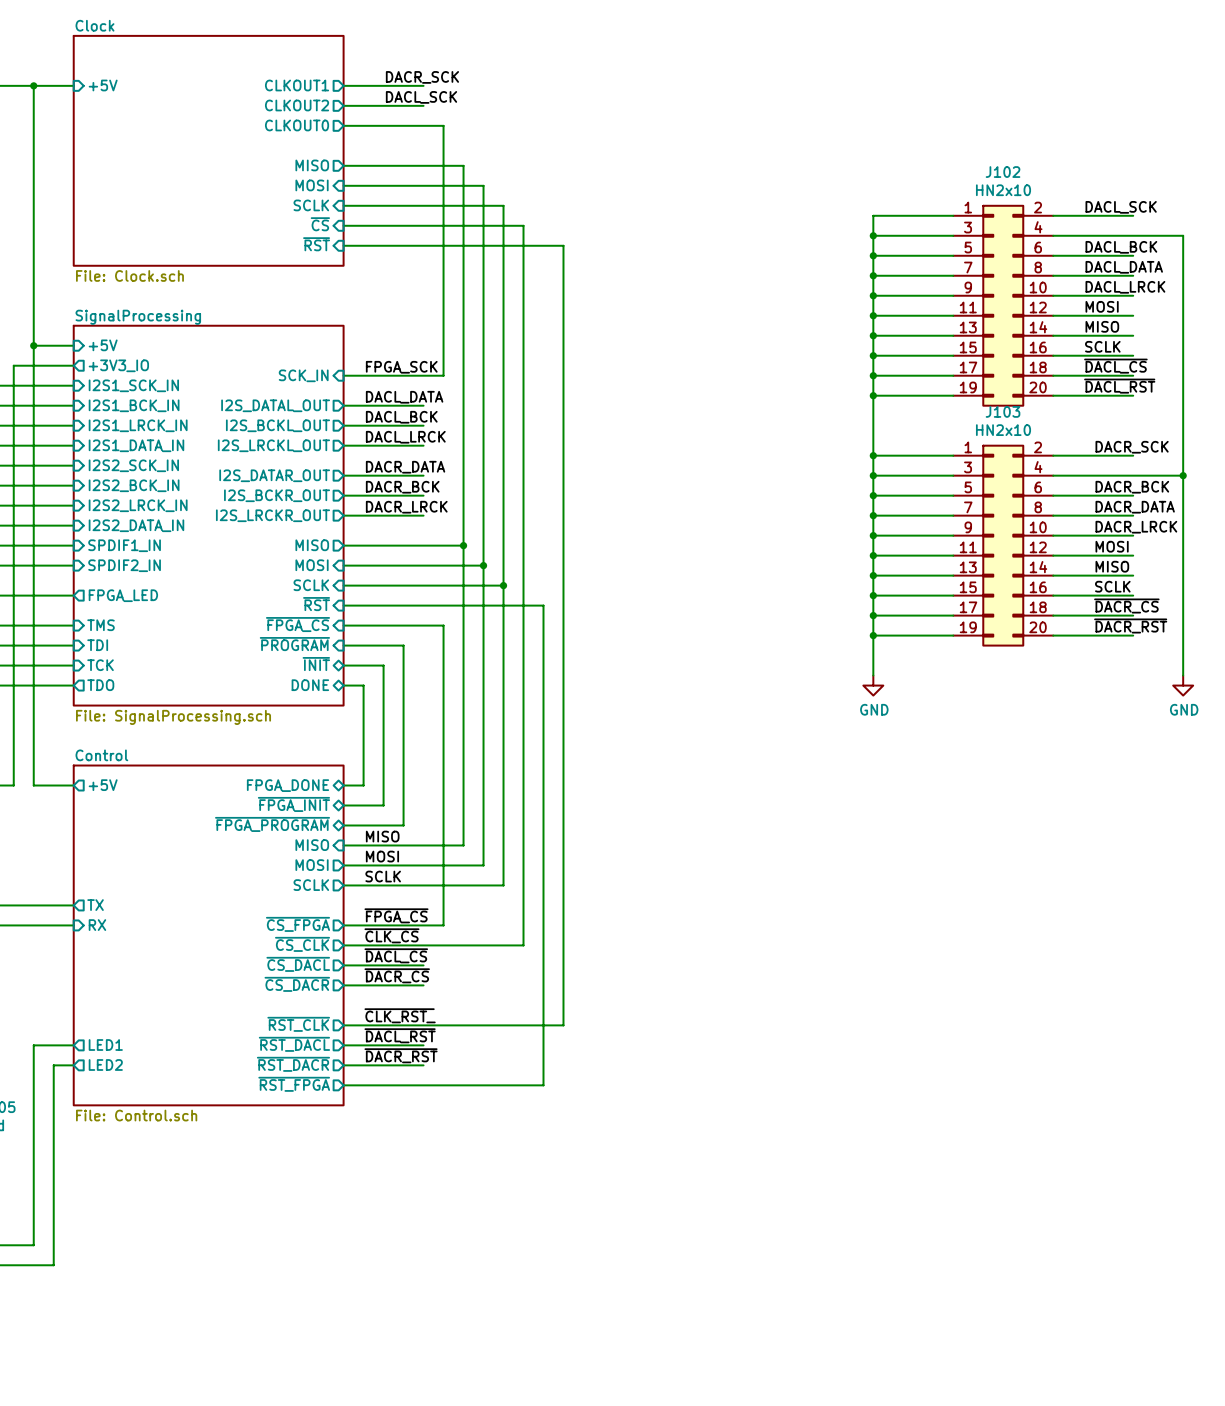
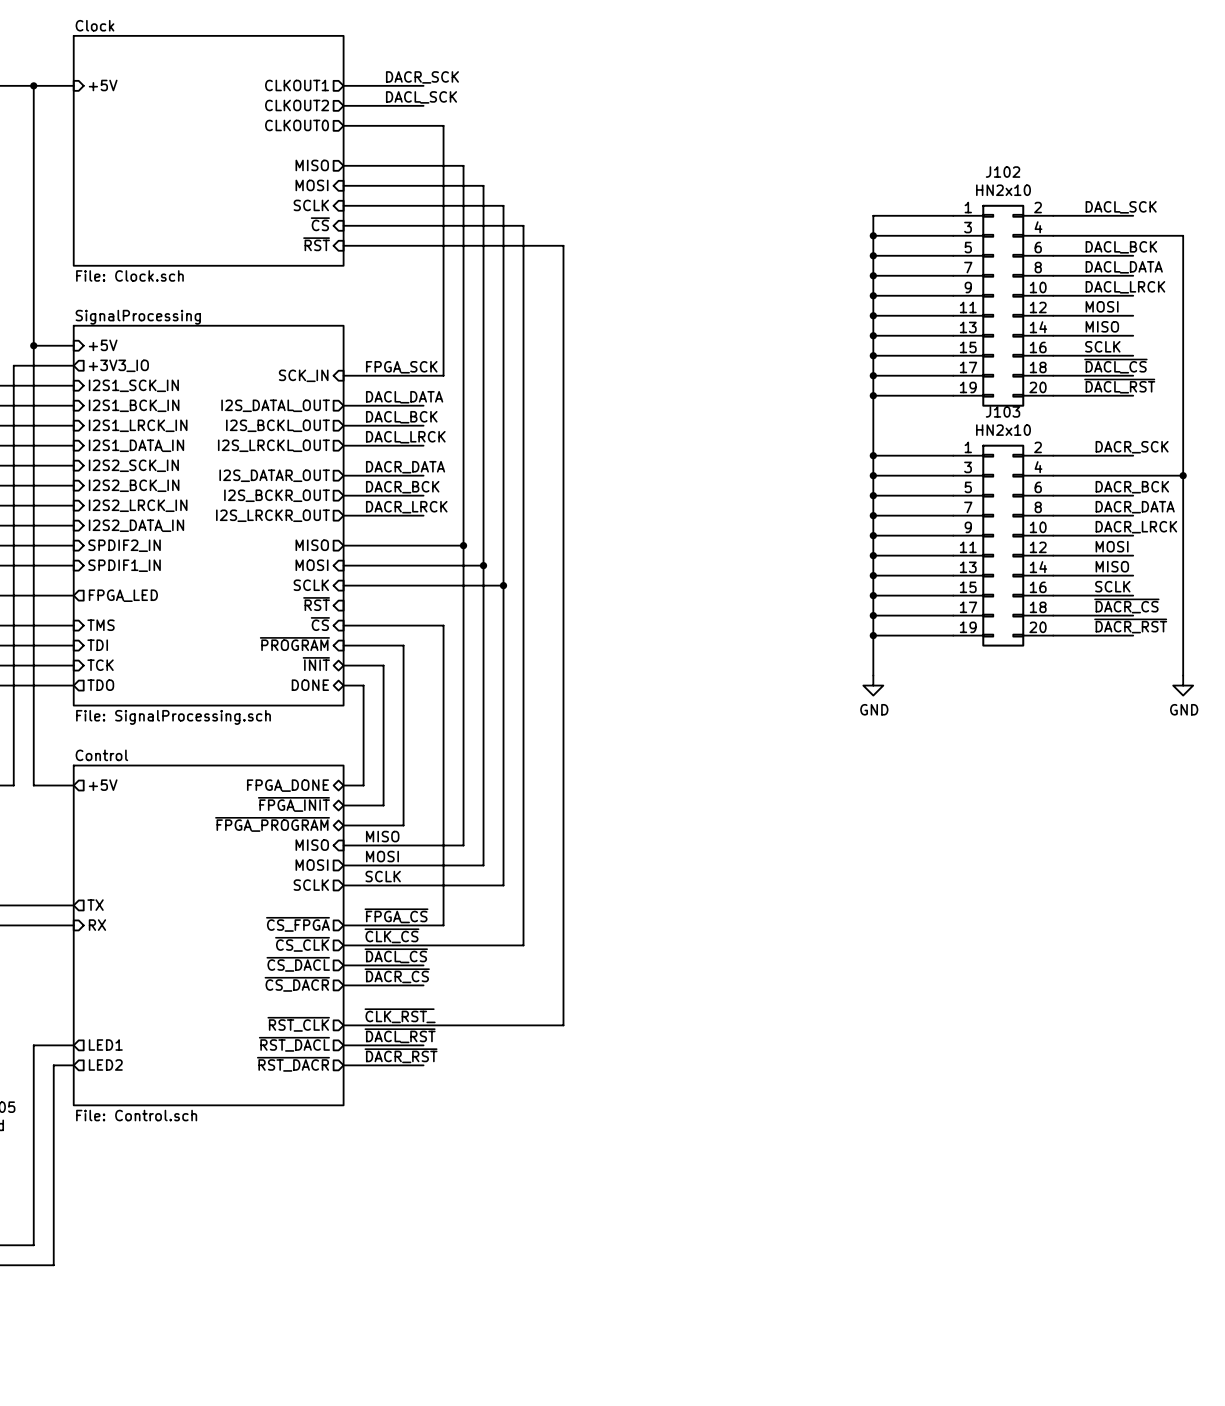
sheet pin: SPDIF1_IN (124, 545) -> SPDIF2_IN (124, 545)
sheet pin: SPDIF2_IN (124, 565) -> SPDIF1_IN (124, 565)
wire: (343, 605) (543, 605) (543, 1085) (343, 1085) -> none
sheet pin: ~{FPGA_CS} (297, 624) -> ~{CS} (320, 624)
sheet pin: ~{RST_FPGA} (294, 1084) -> none

